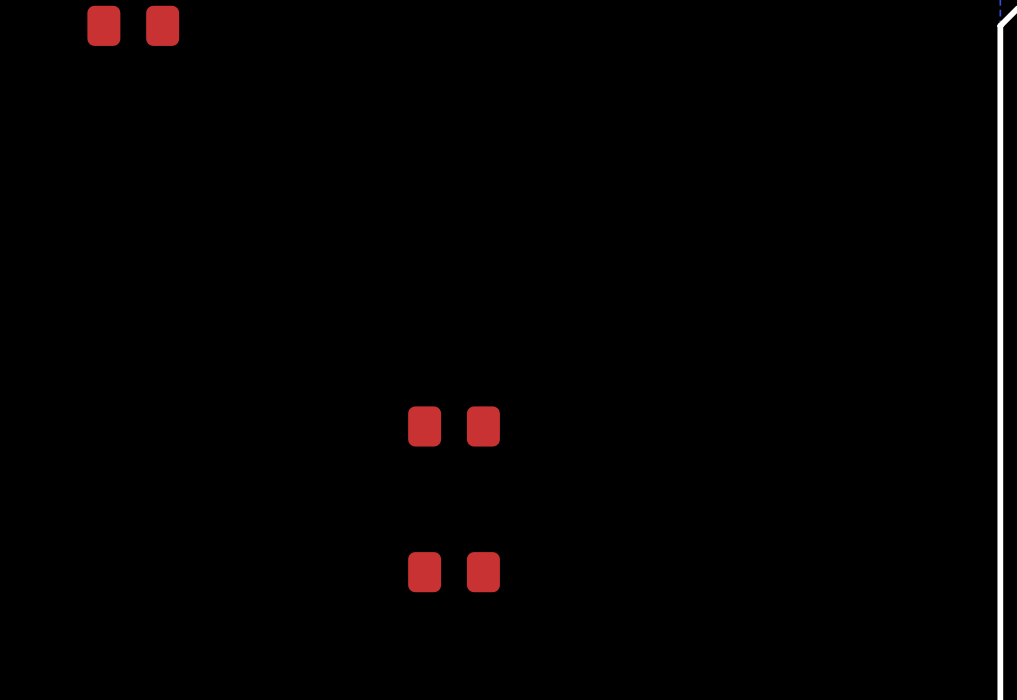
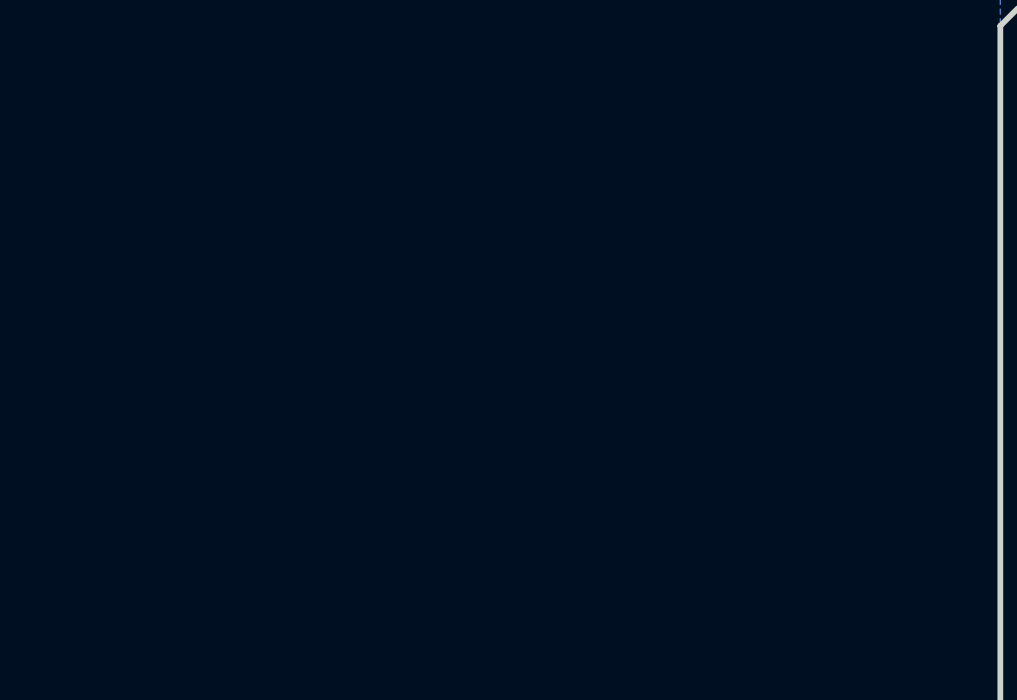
part: (133, 25) -> none
part: (454, 426) -> none
part: (454, 572) -> none

